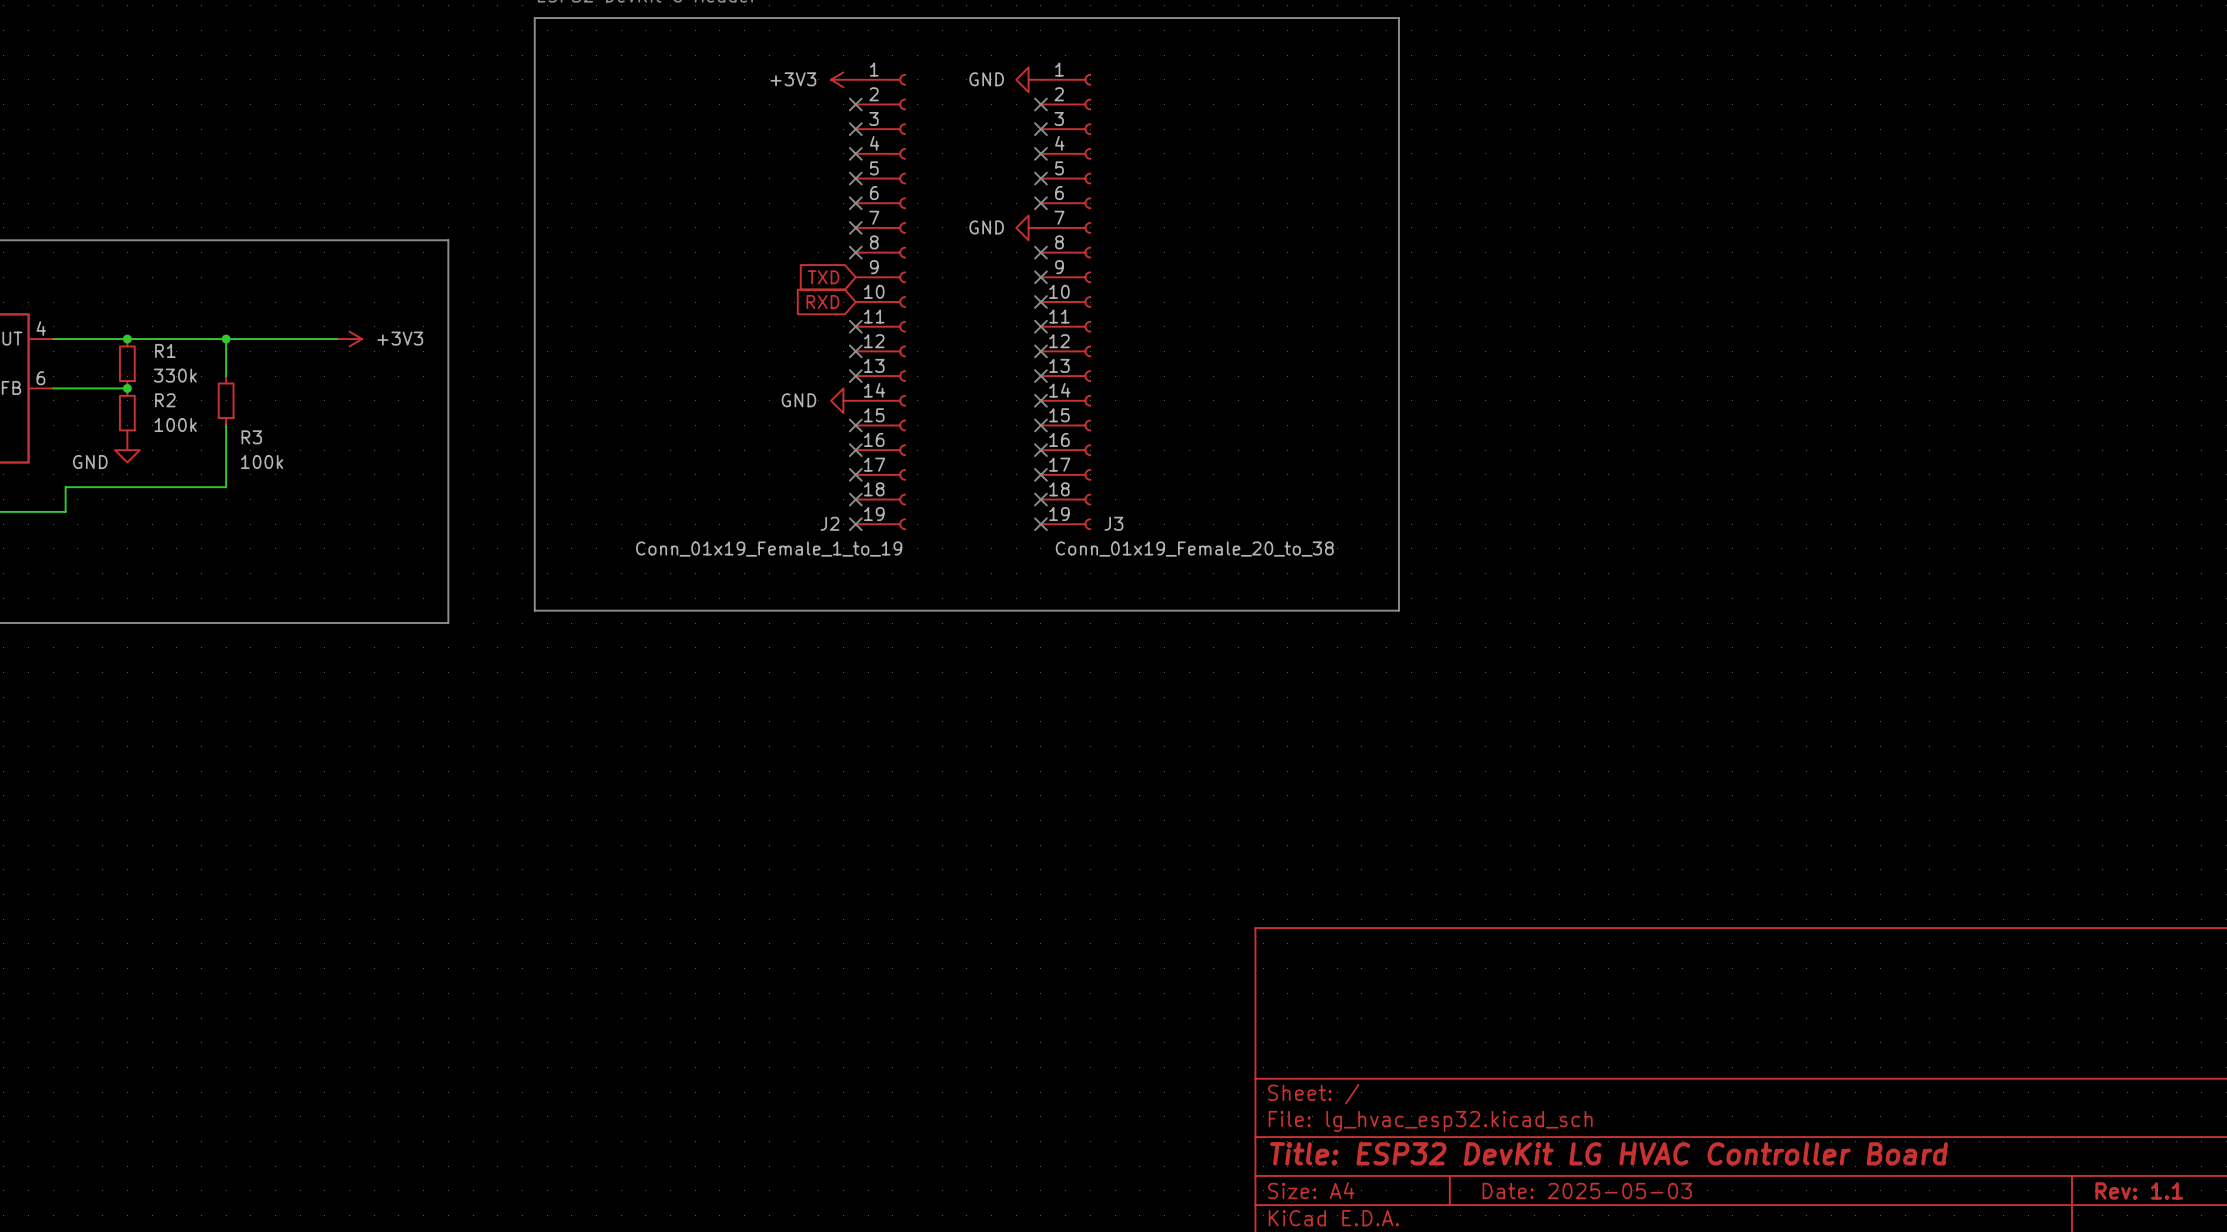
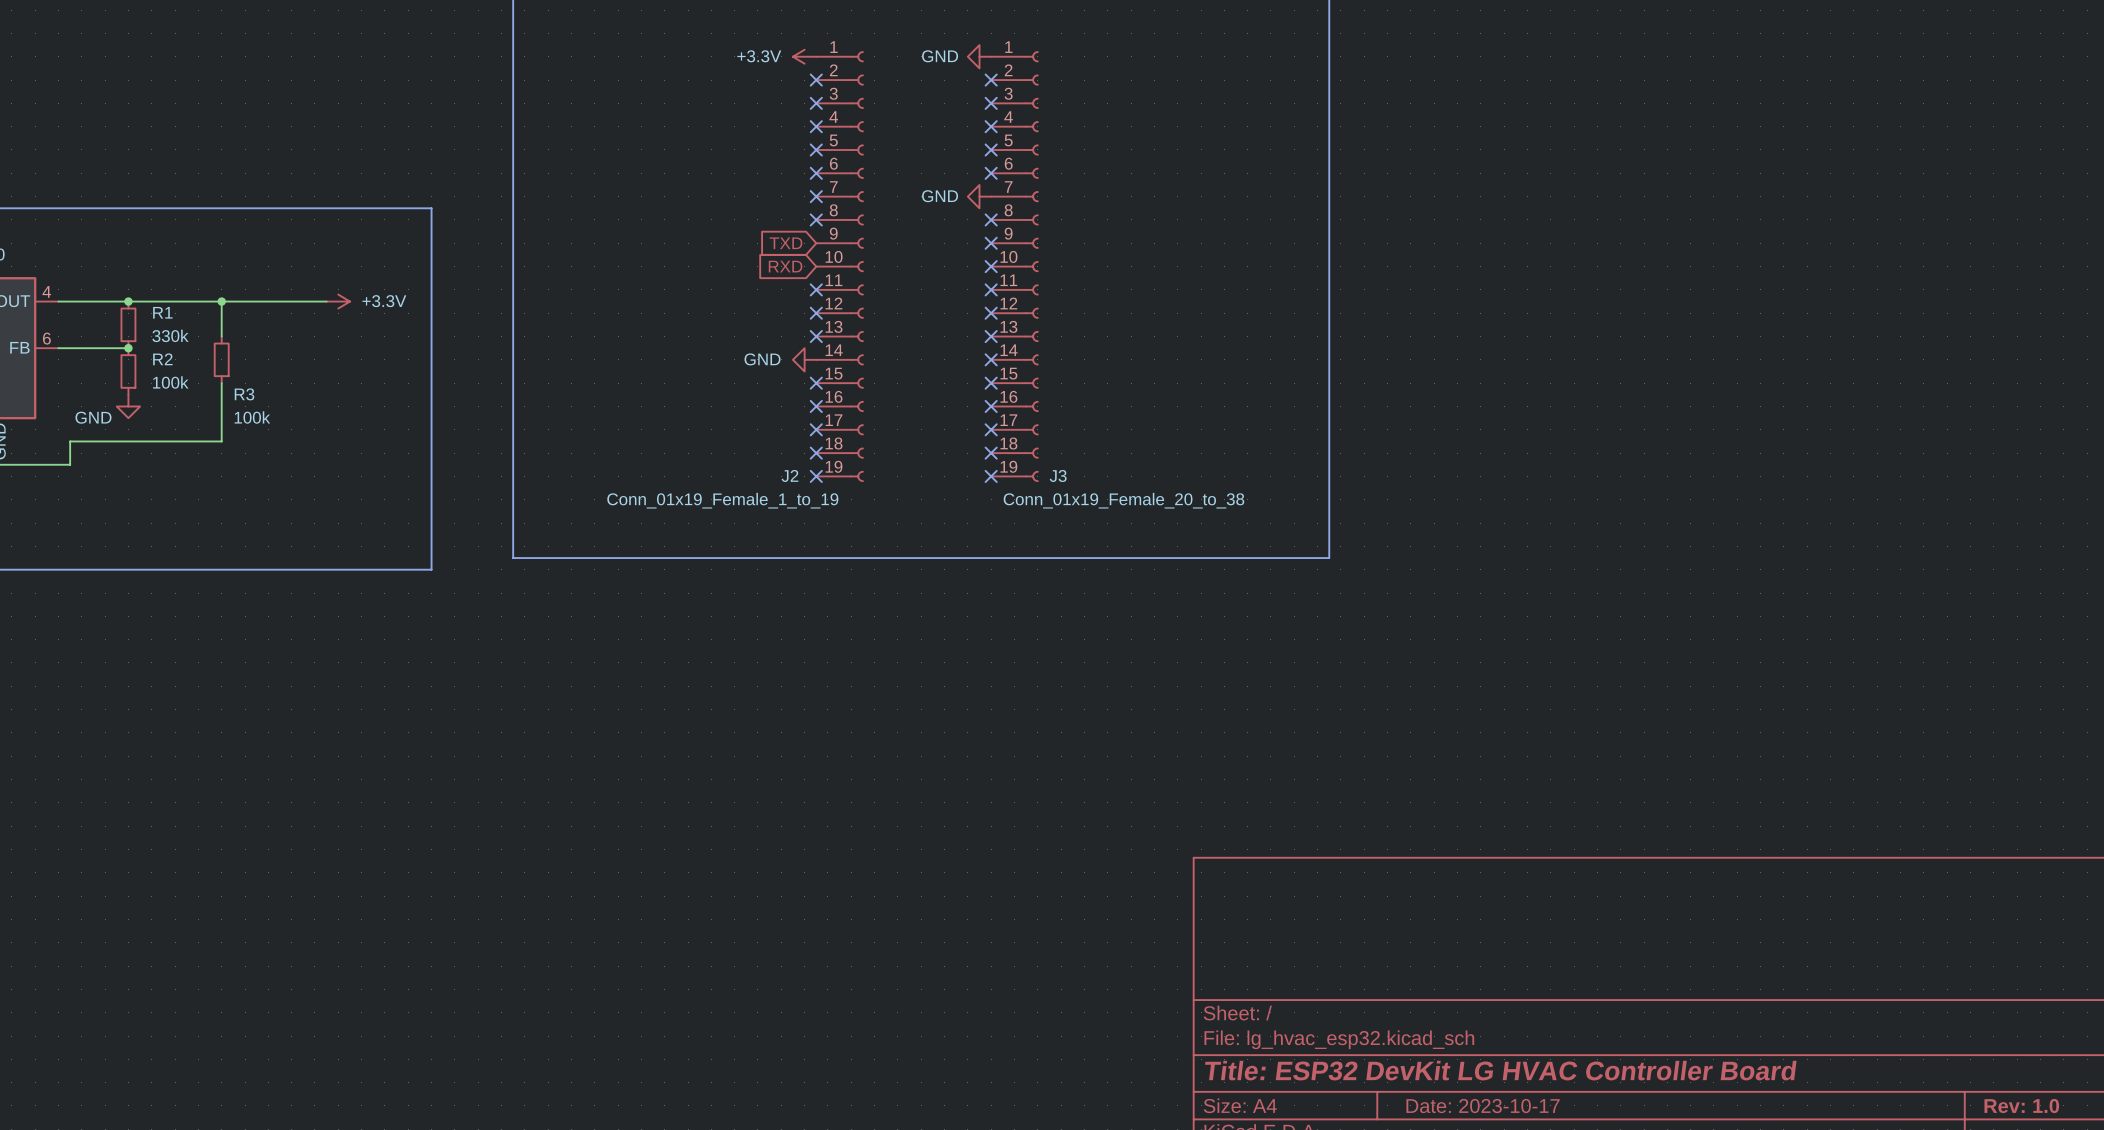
power symbol: +3V3 (843, 79) -> +3.3V (804, 56)
power symbol: +3V3 (349, 339) -> +3.3V (338, 301)
title block: Date: 2025-05-03 (1587, 1190) -> Date: 2023-10-17 (1483, 1106)
title block: Rev: 1.1 (2139, 1190) -> Rev: 1.0 (2021, 1106)

